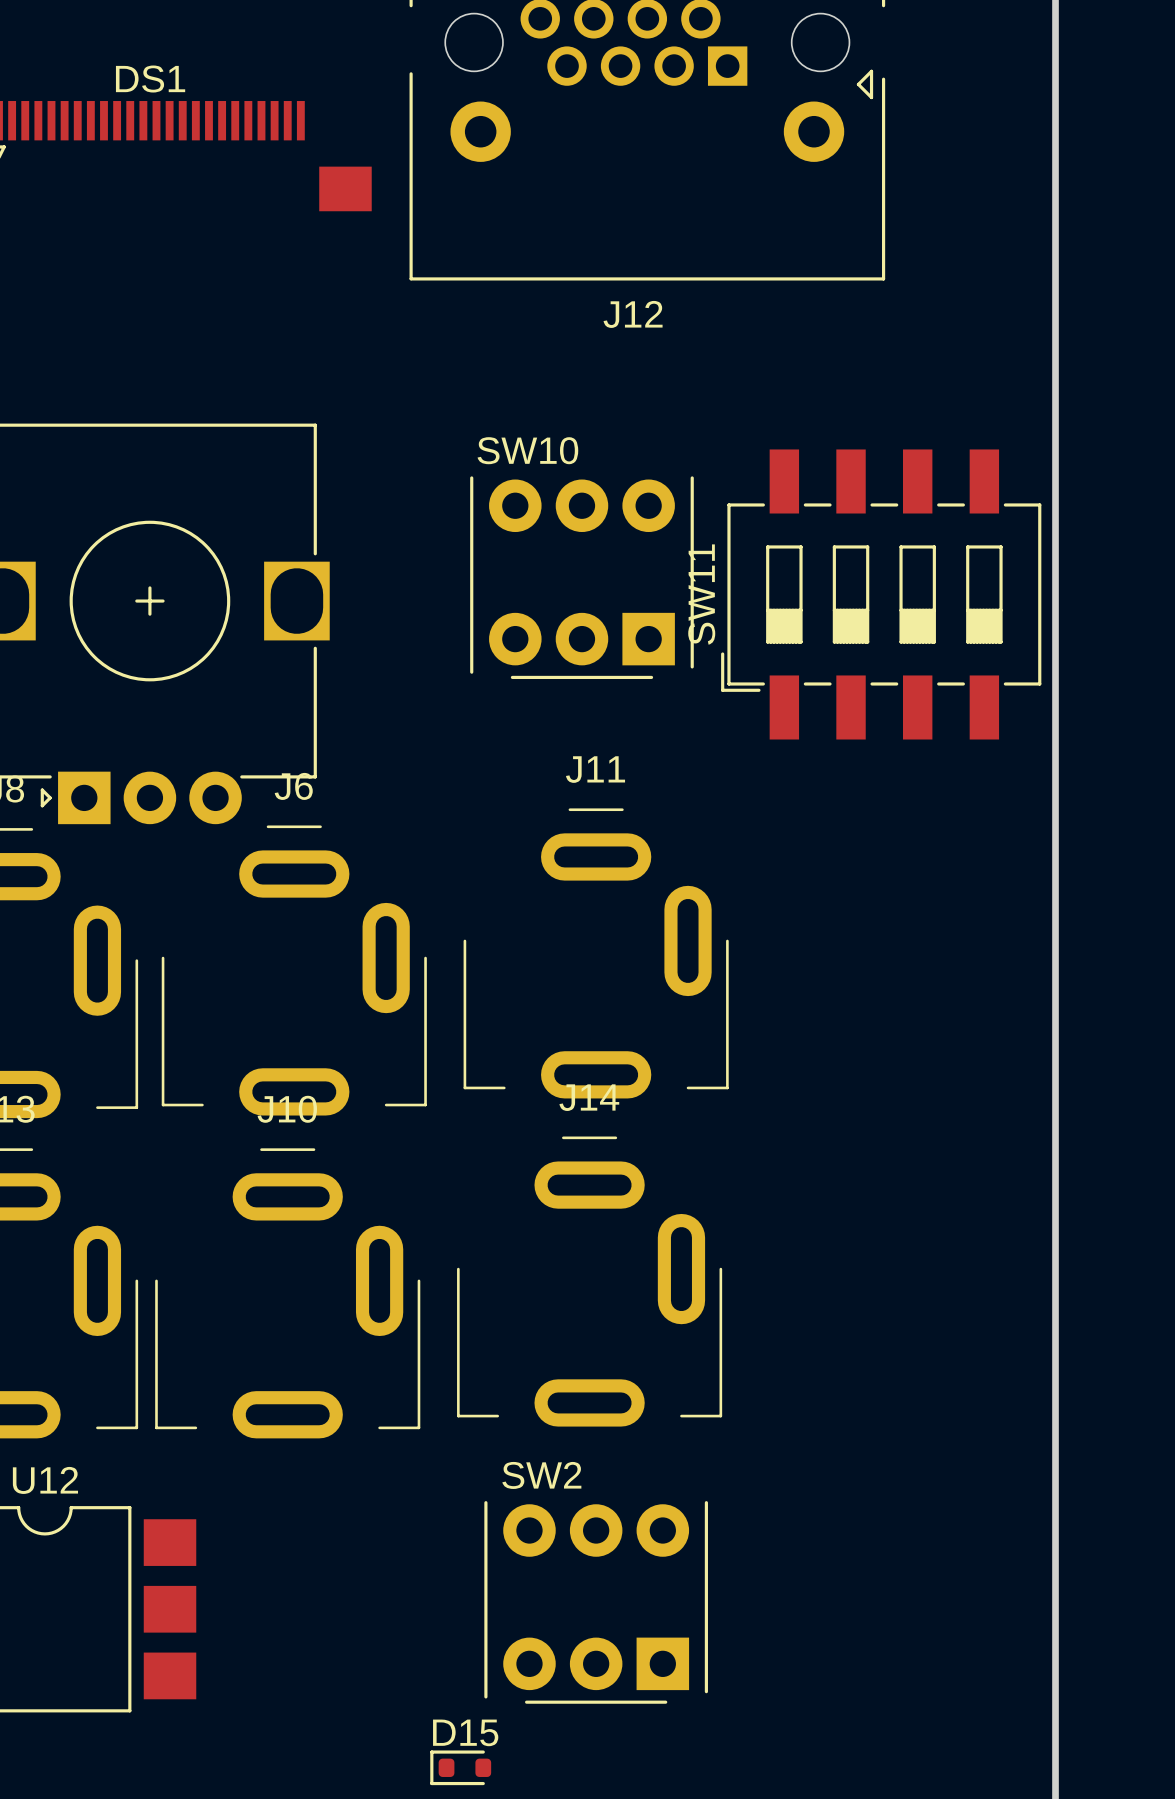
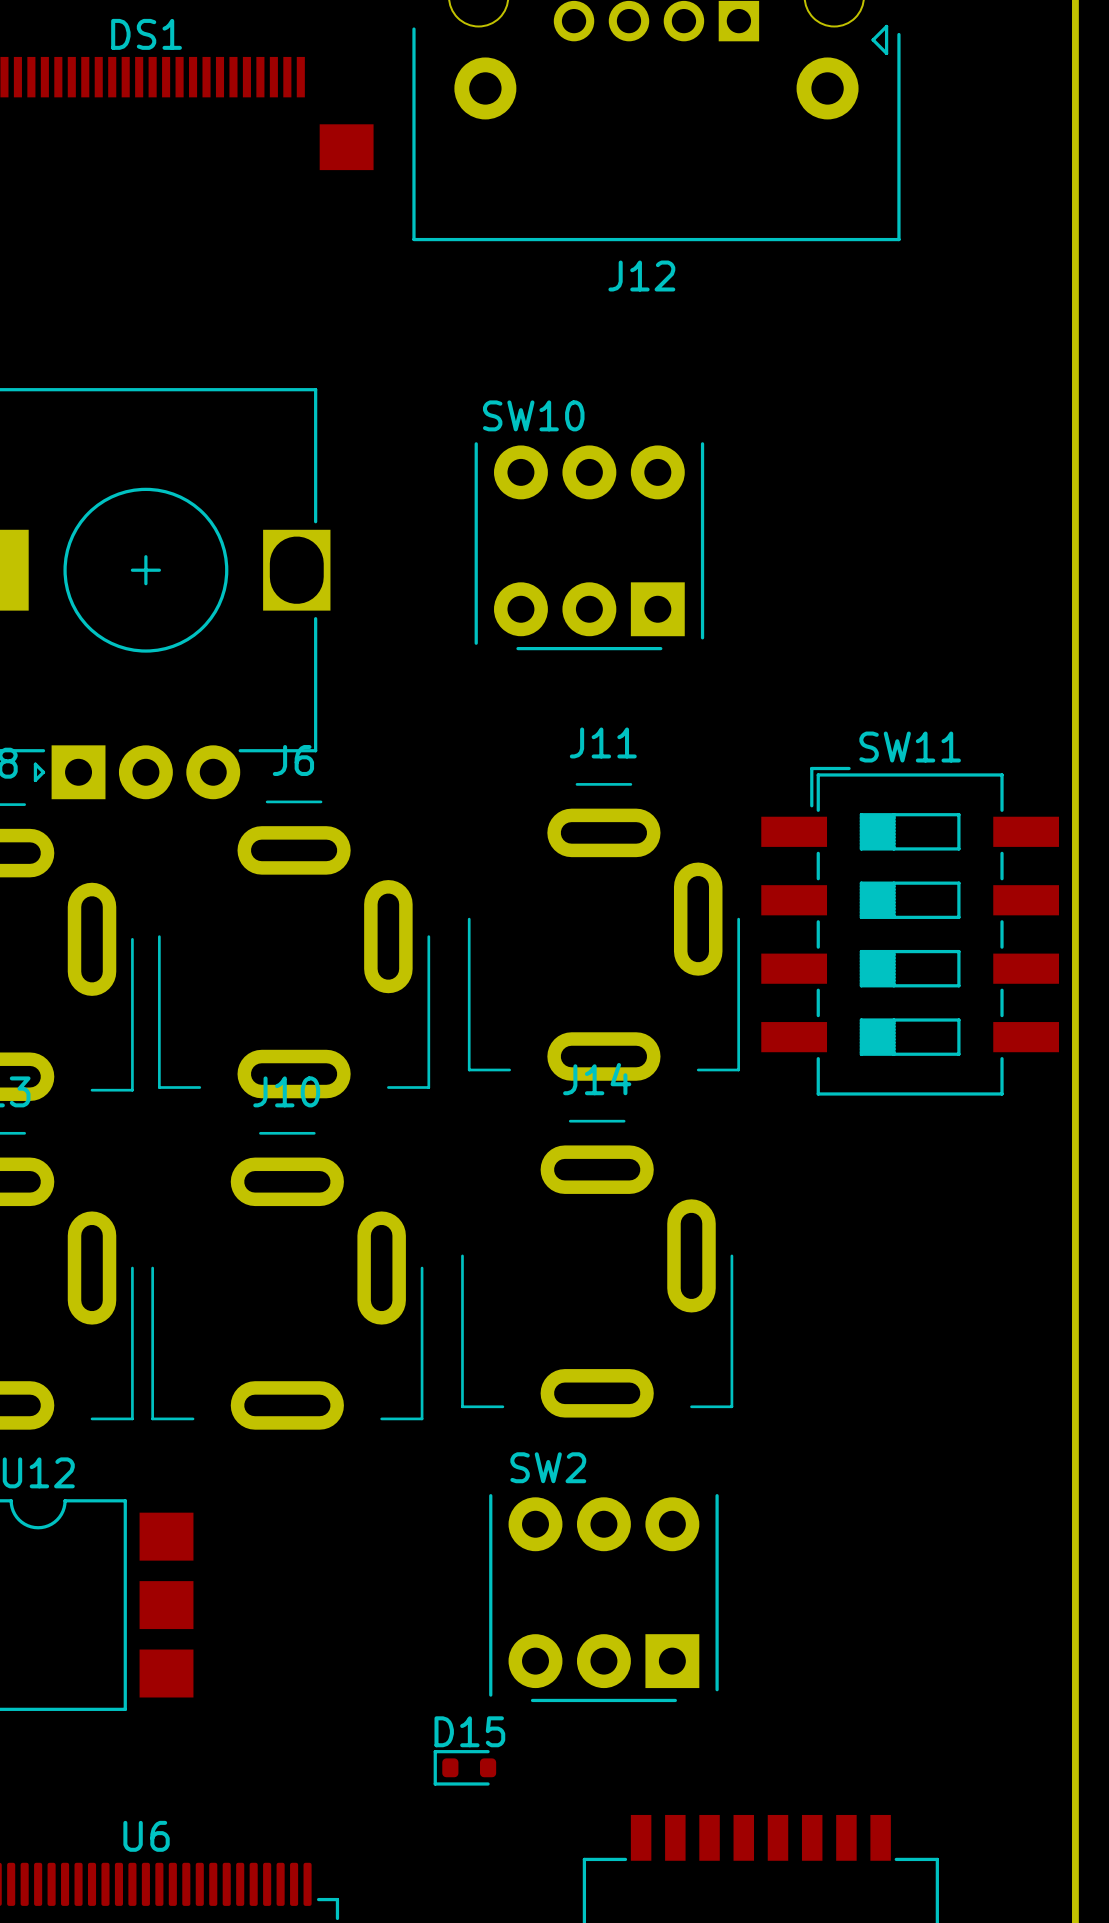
SW11 rotation: 0° (881, 594) -> 90° clockwise (910, 931)
SW11 position: (881, 594) -> (910, 931)

